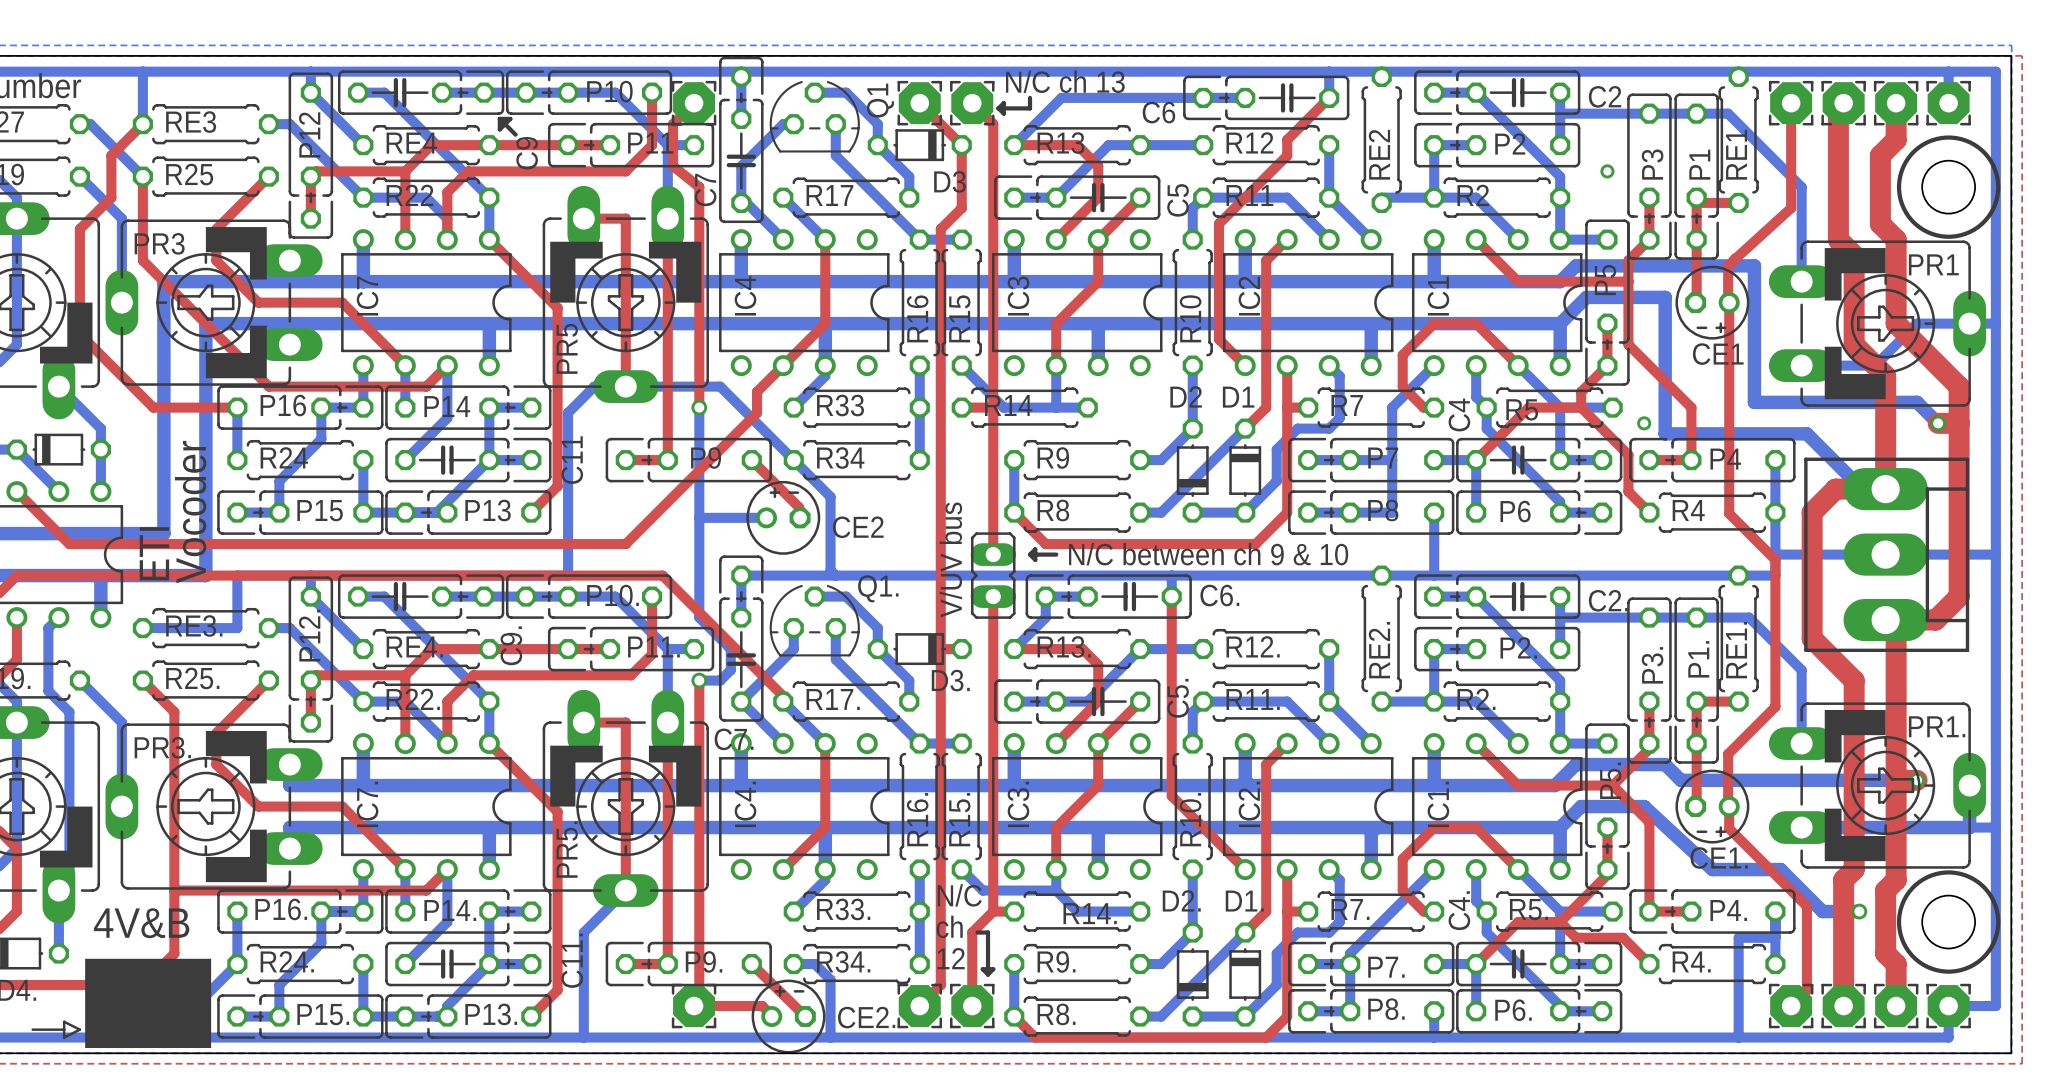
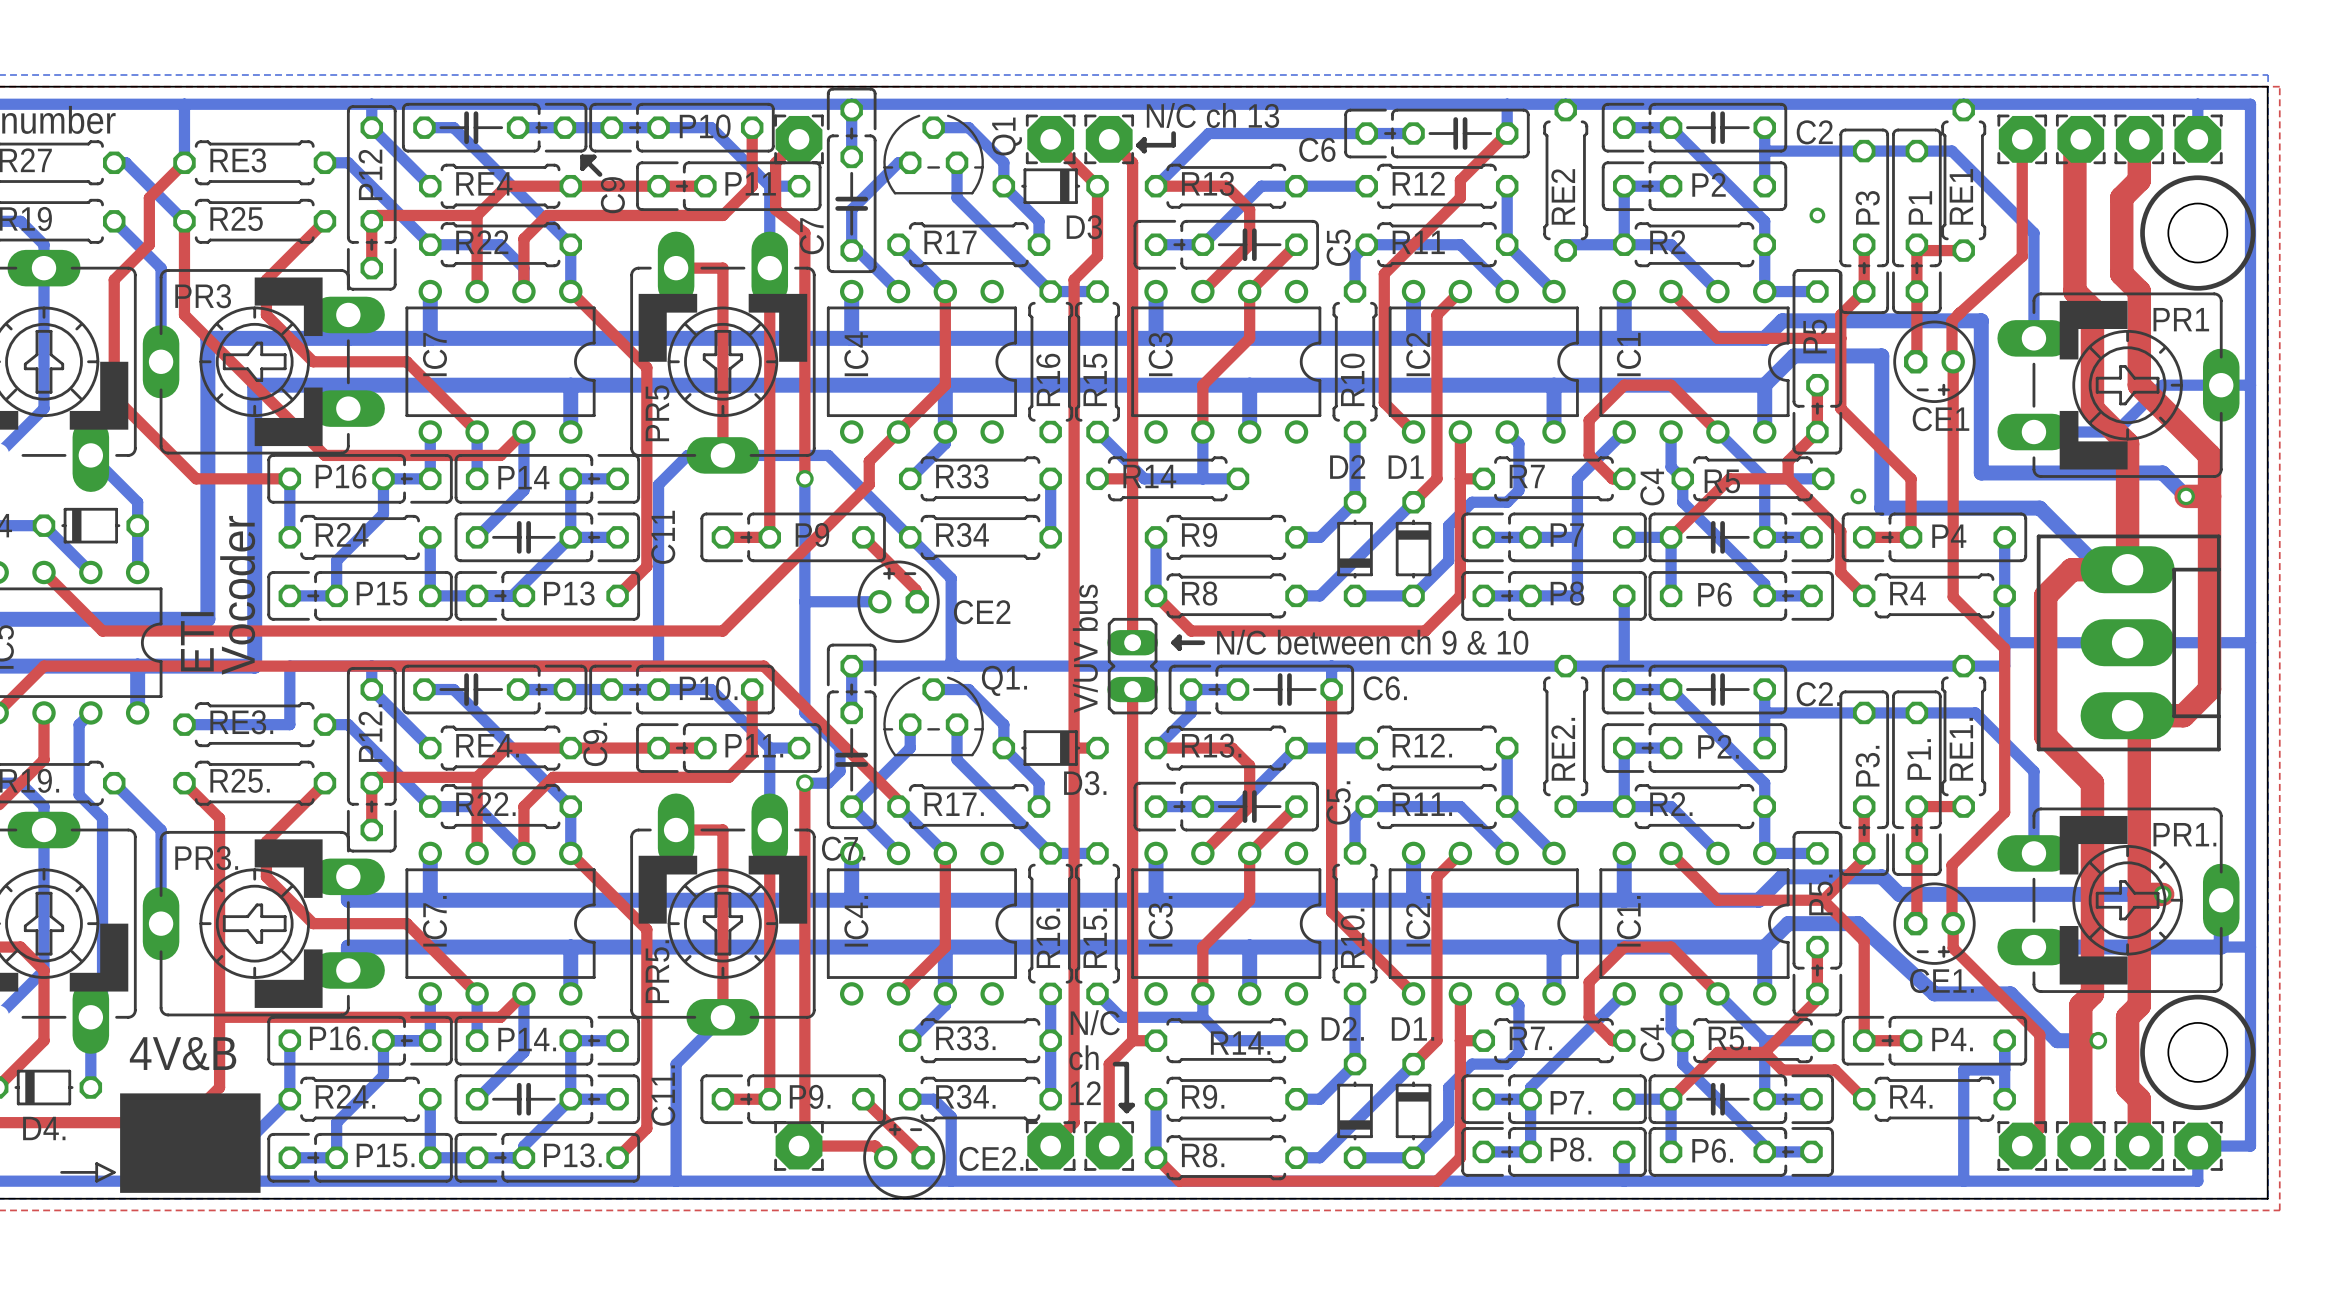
bottom track: (919, 365) (919, 407) -> none

